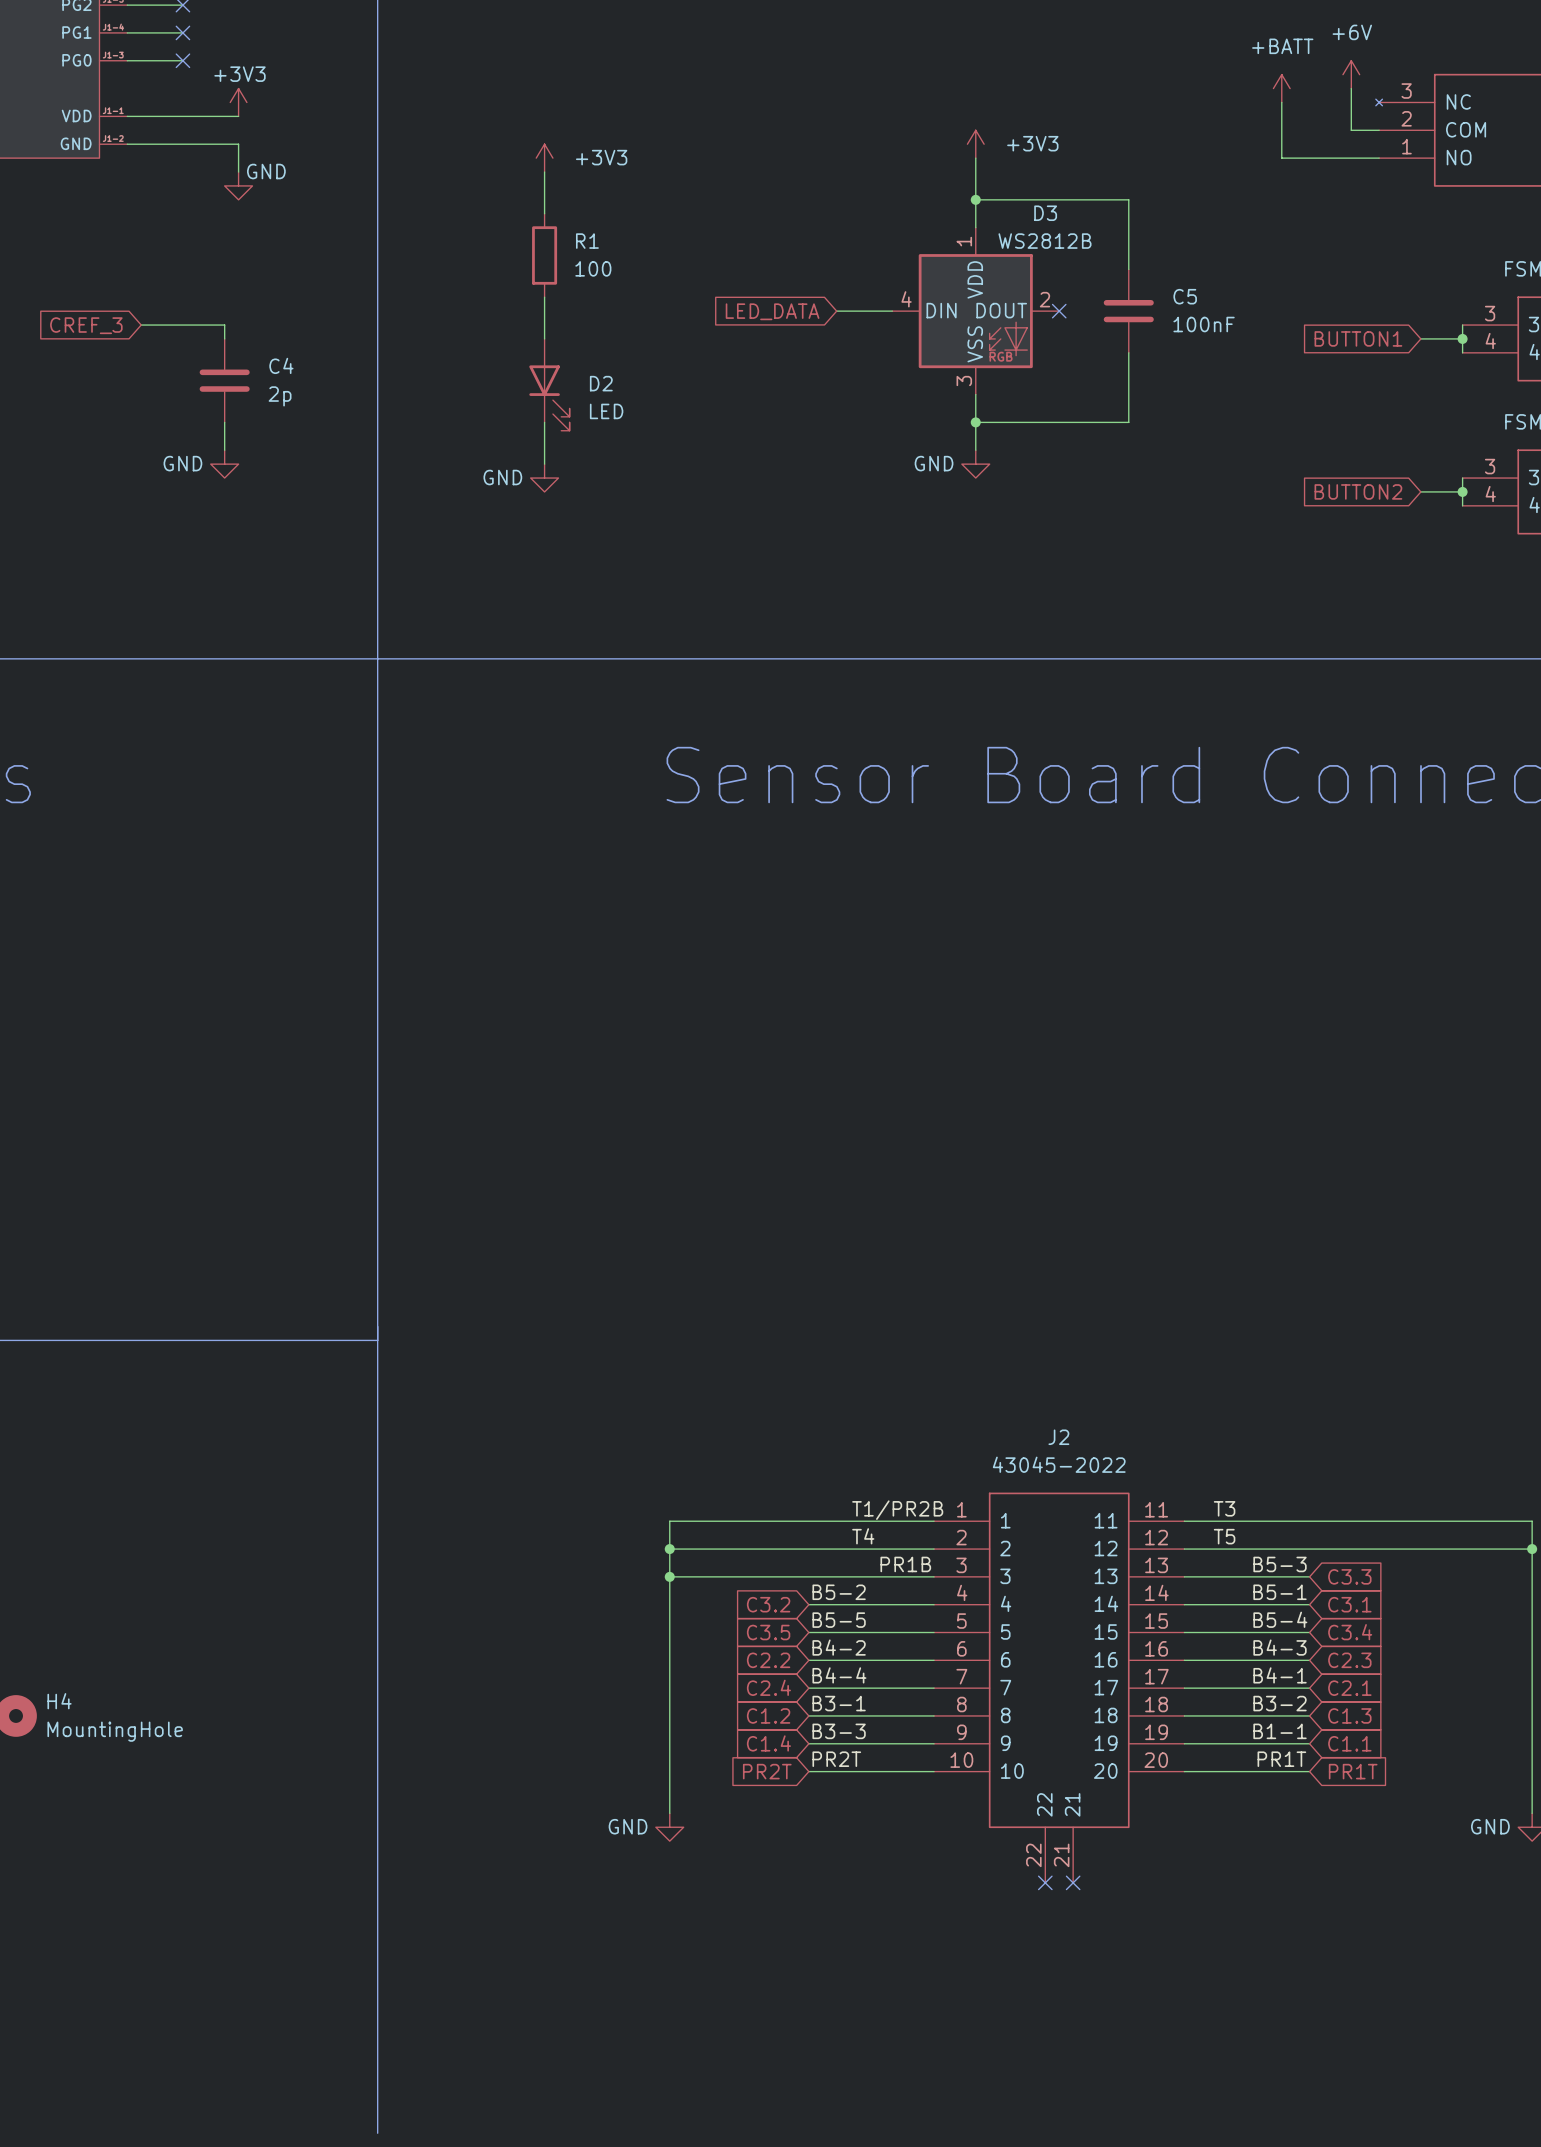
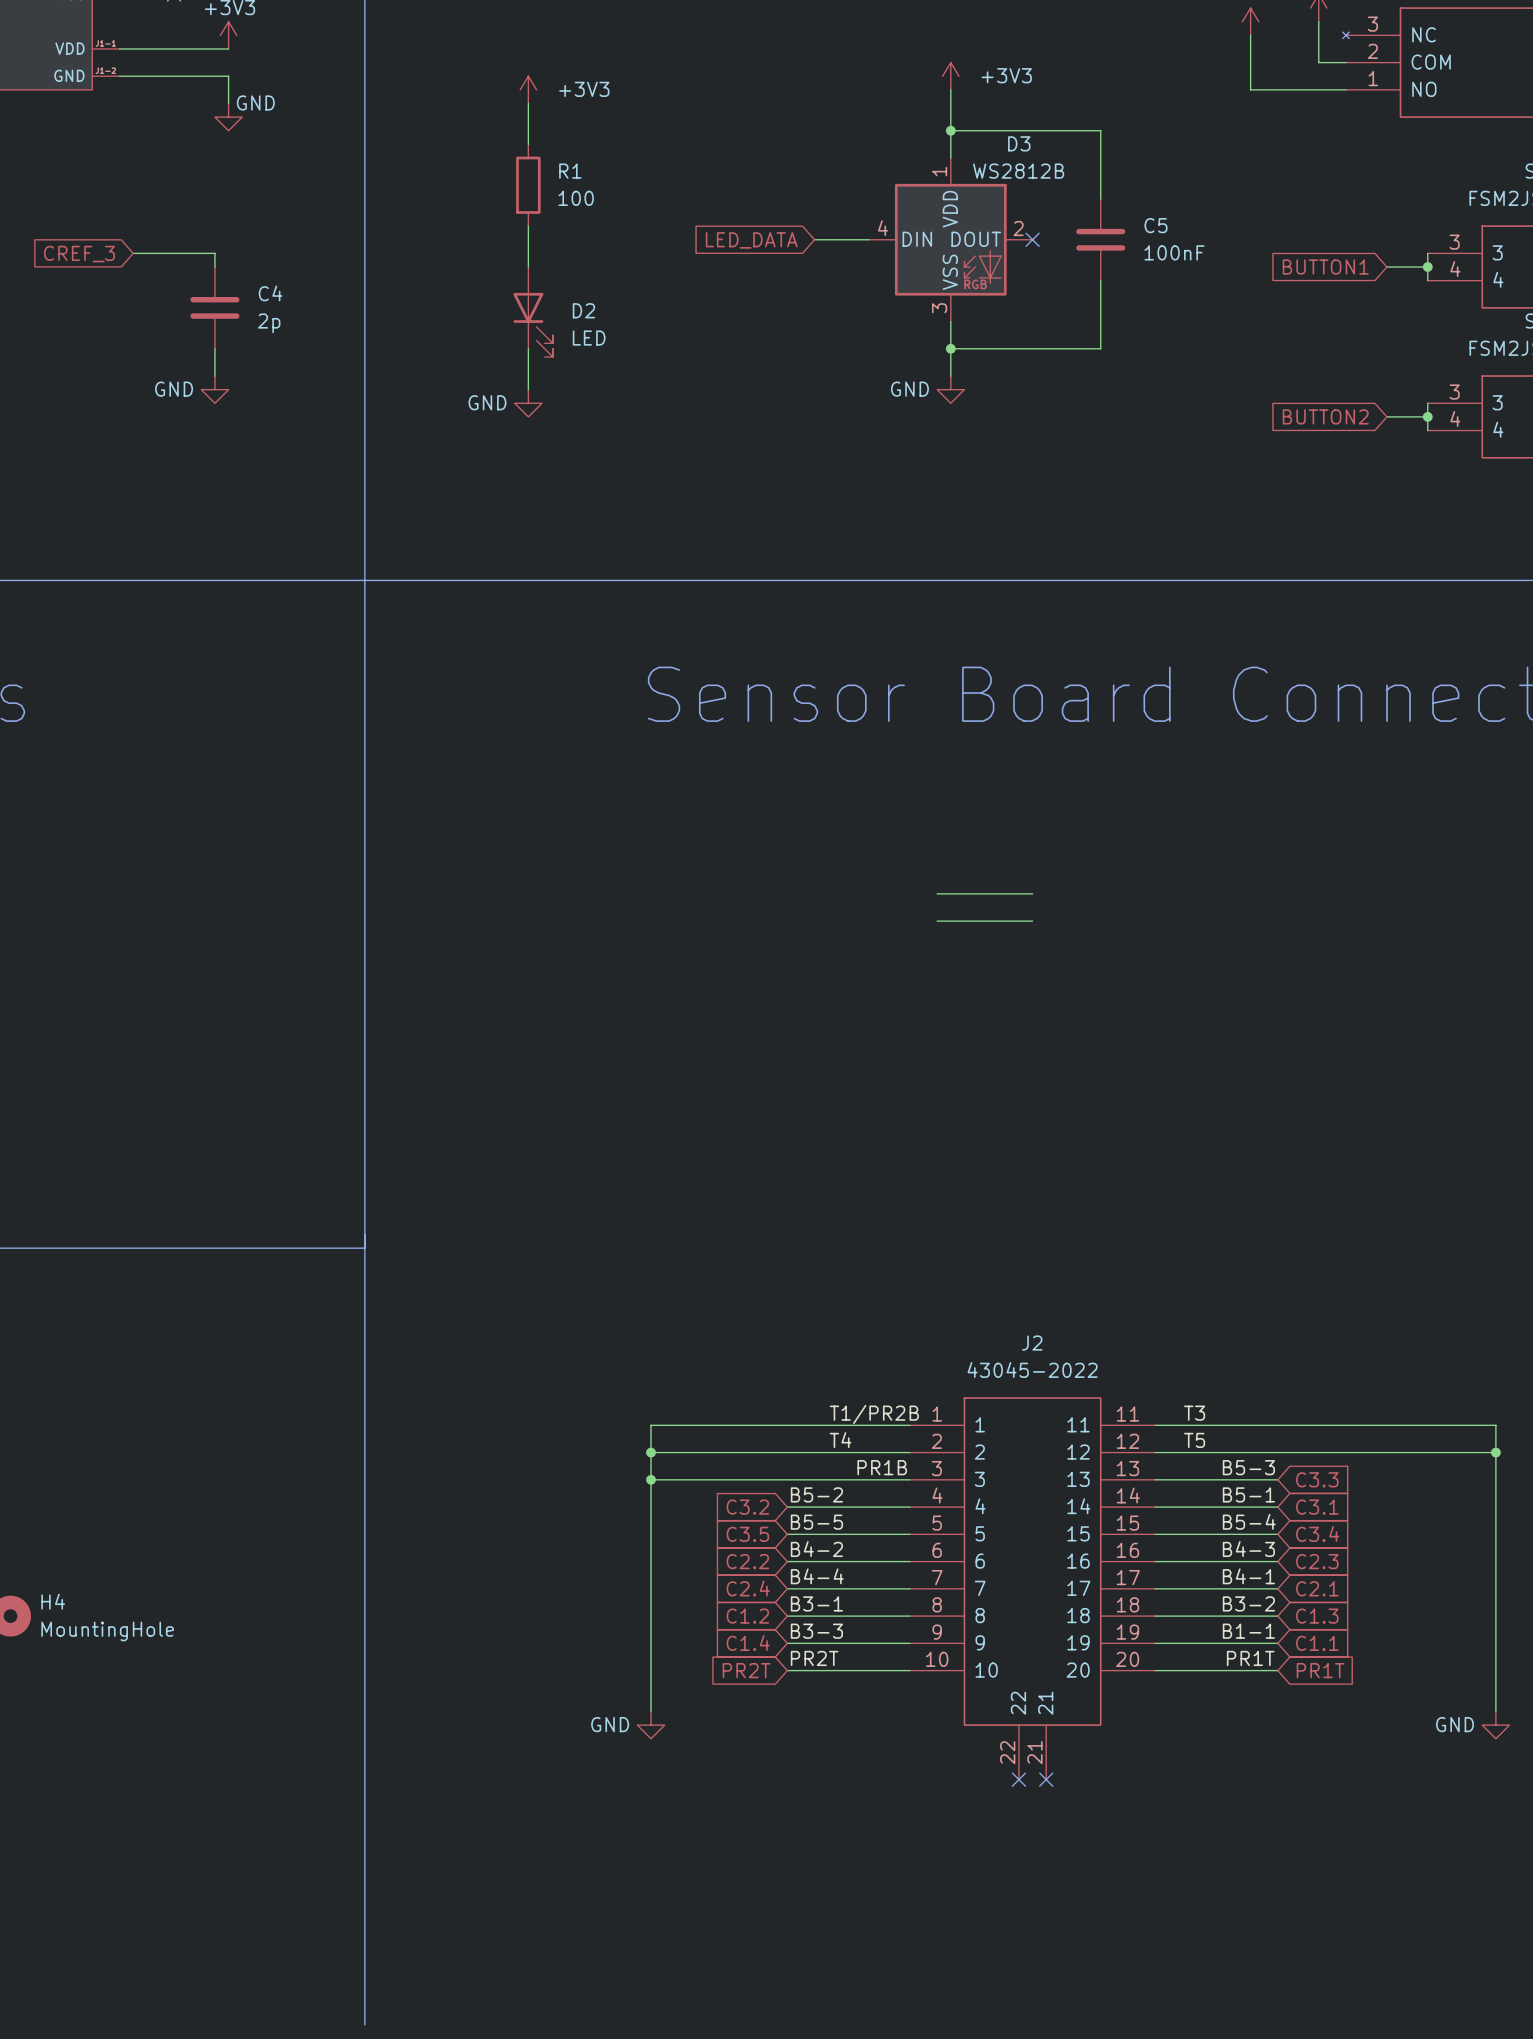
wire: none -> (937, 893) (1032, 893)
wire: none -> (937, 921) (1032, 921)

